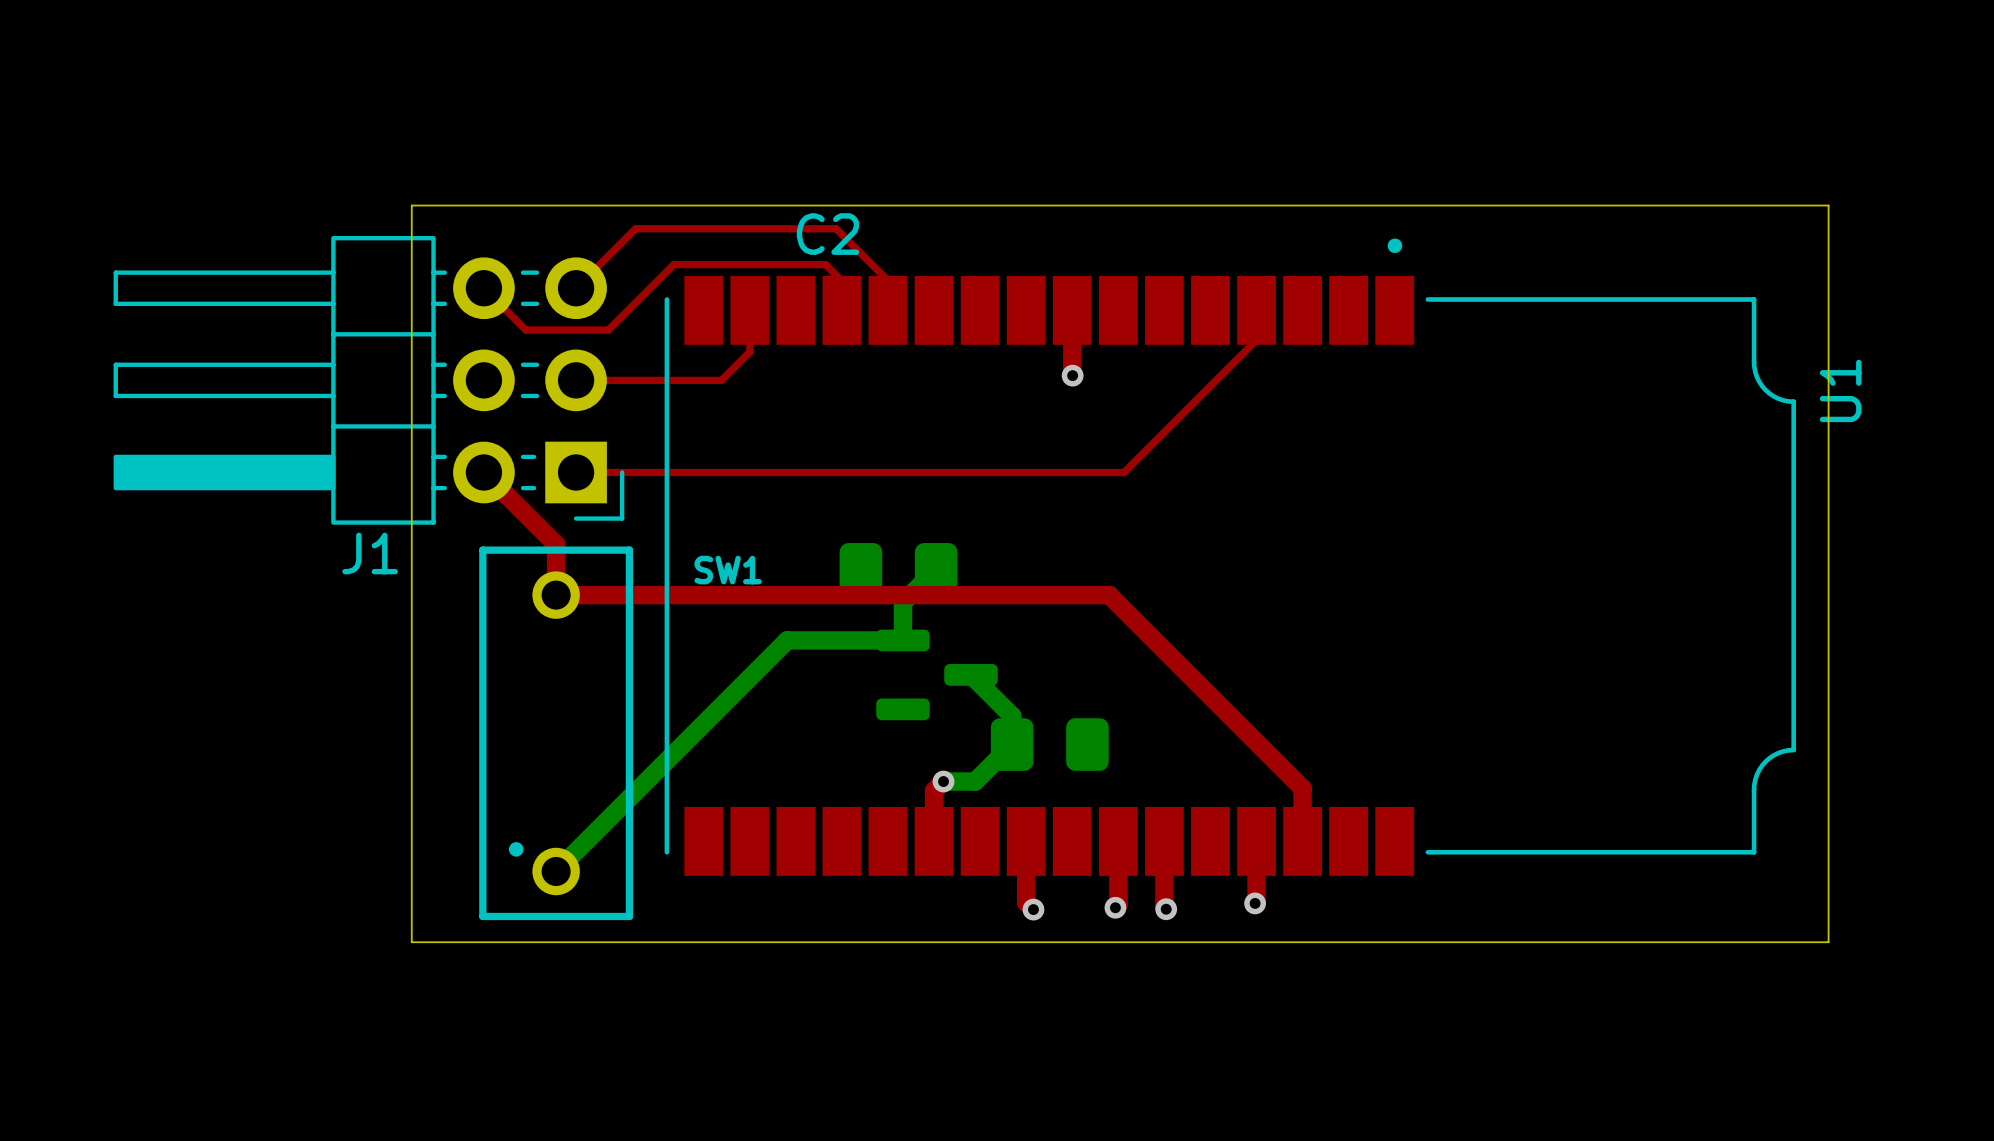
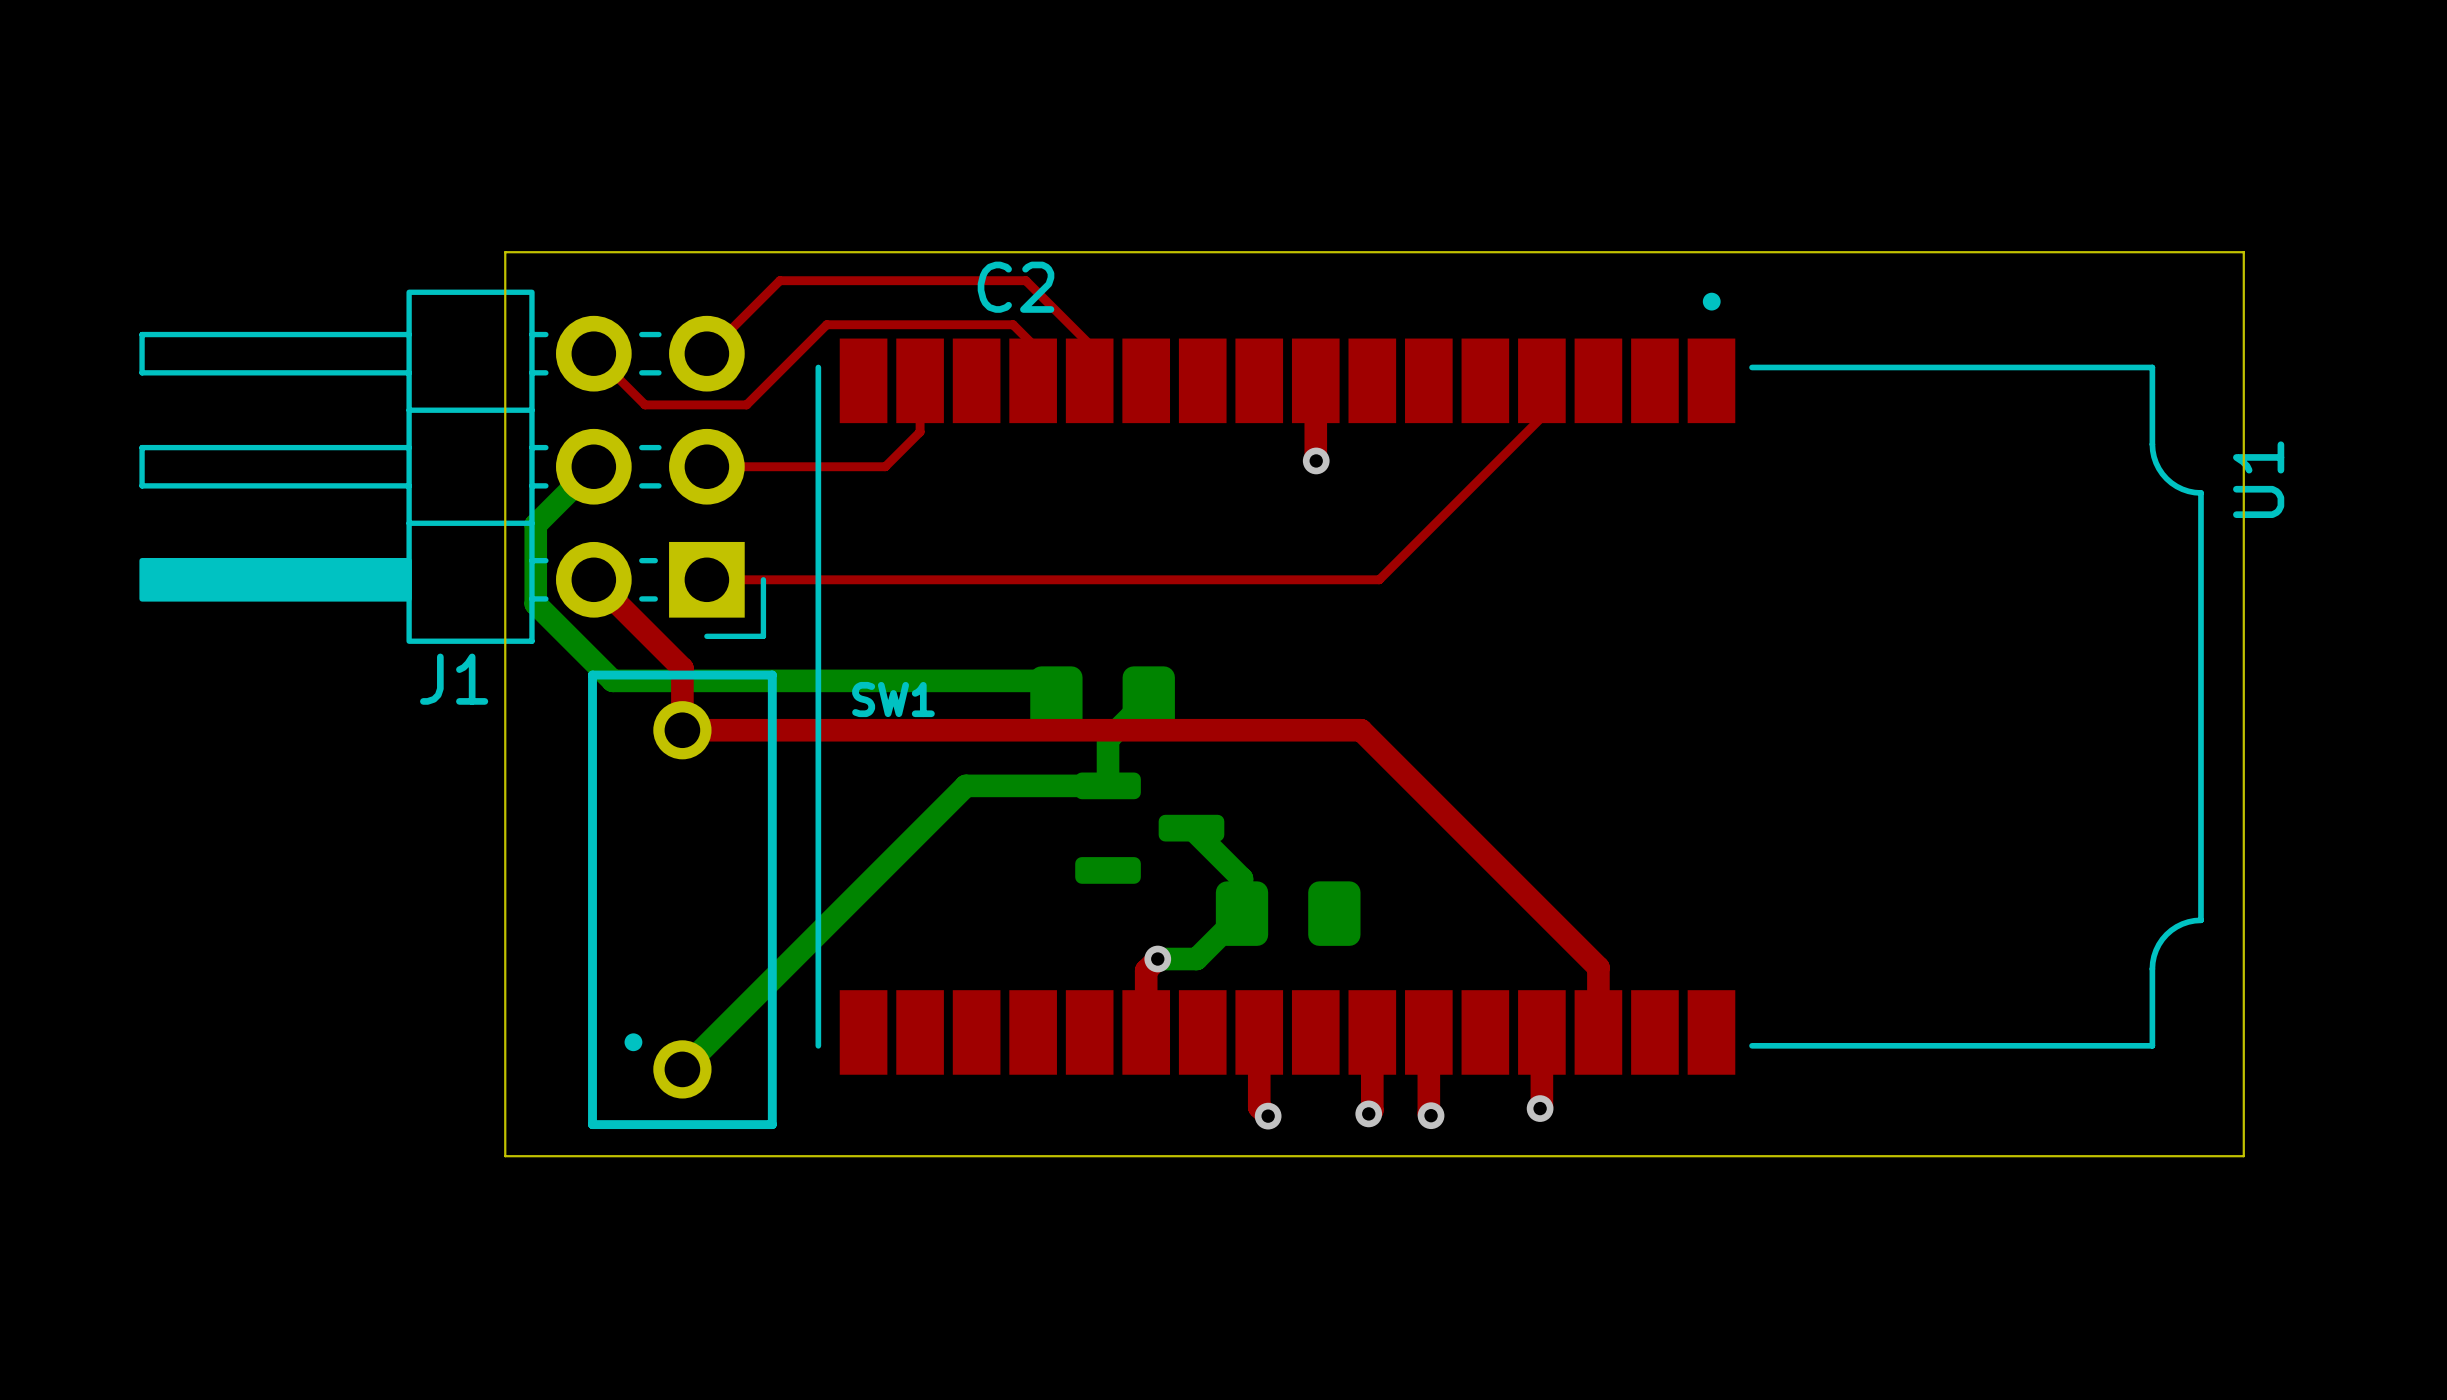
bottom track: none -> (593, 466) (535, 524) (535, 603) (612, 680) (1038, 680) (1056, 698)

